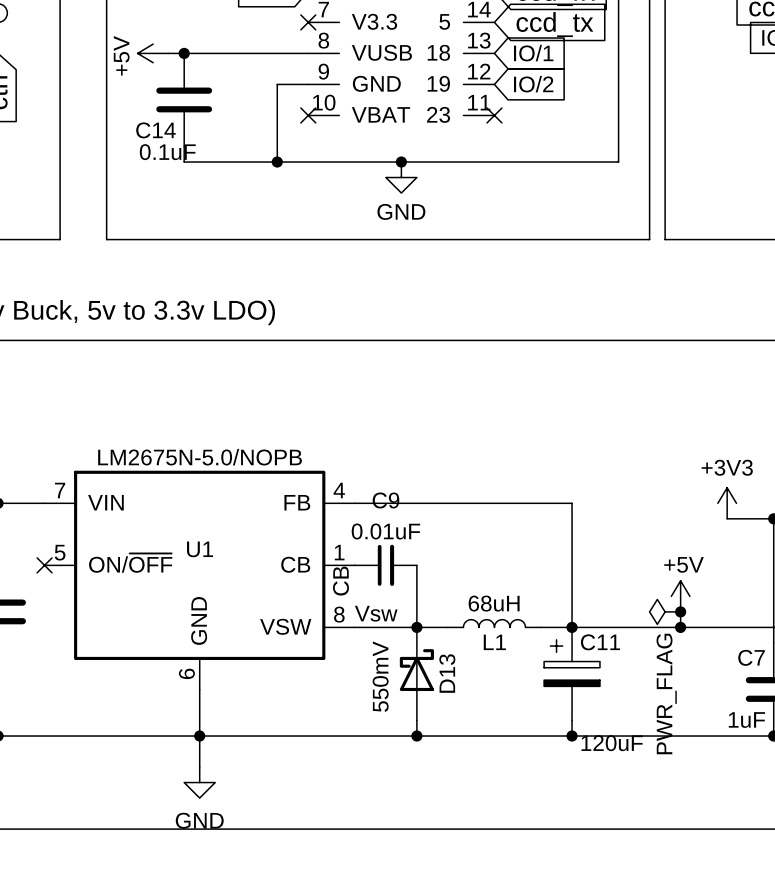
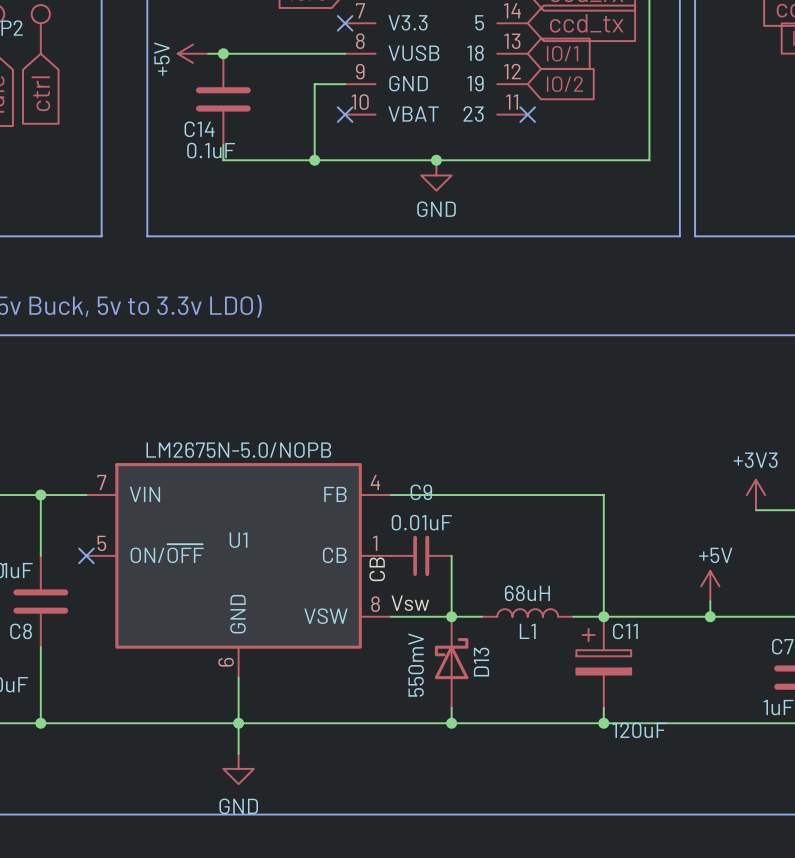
power symbol: PWR_FLAG (665, 611) -> none
junction: (680, 611) -> none

